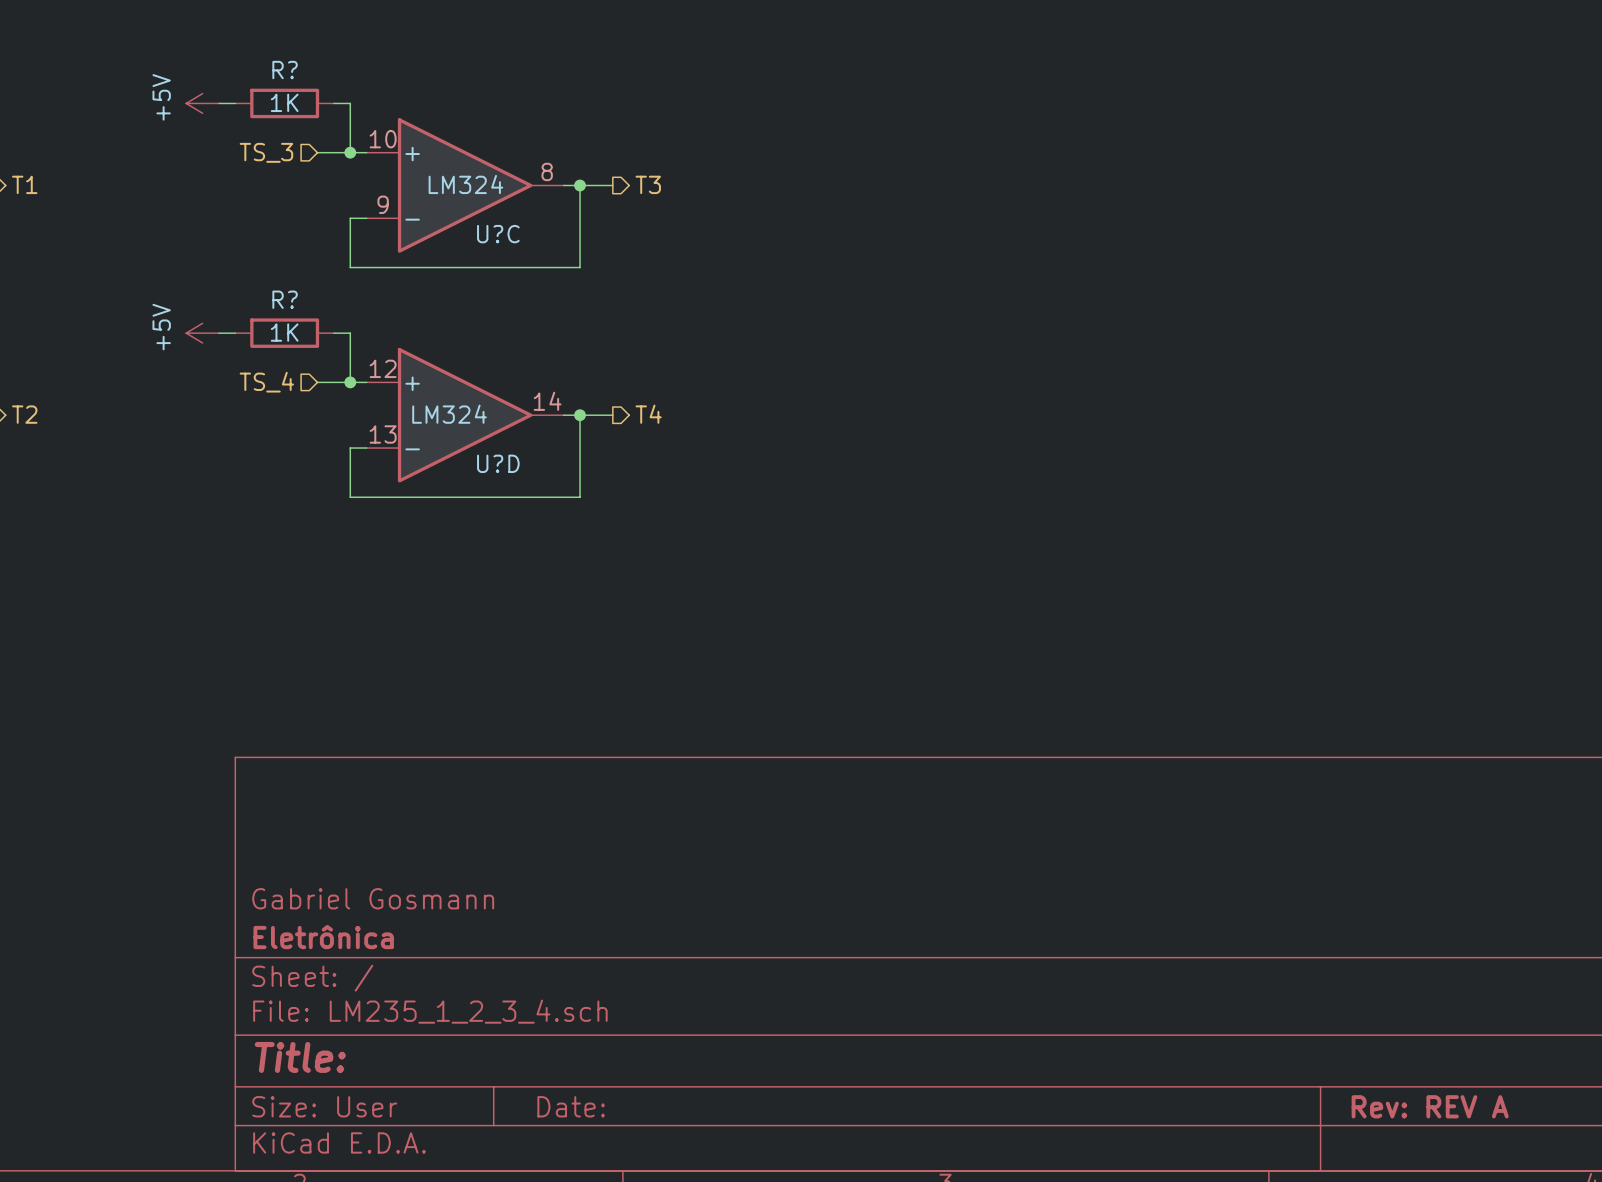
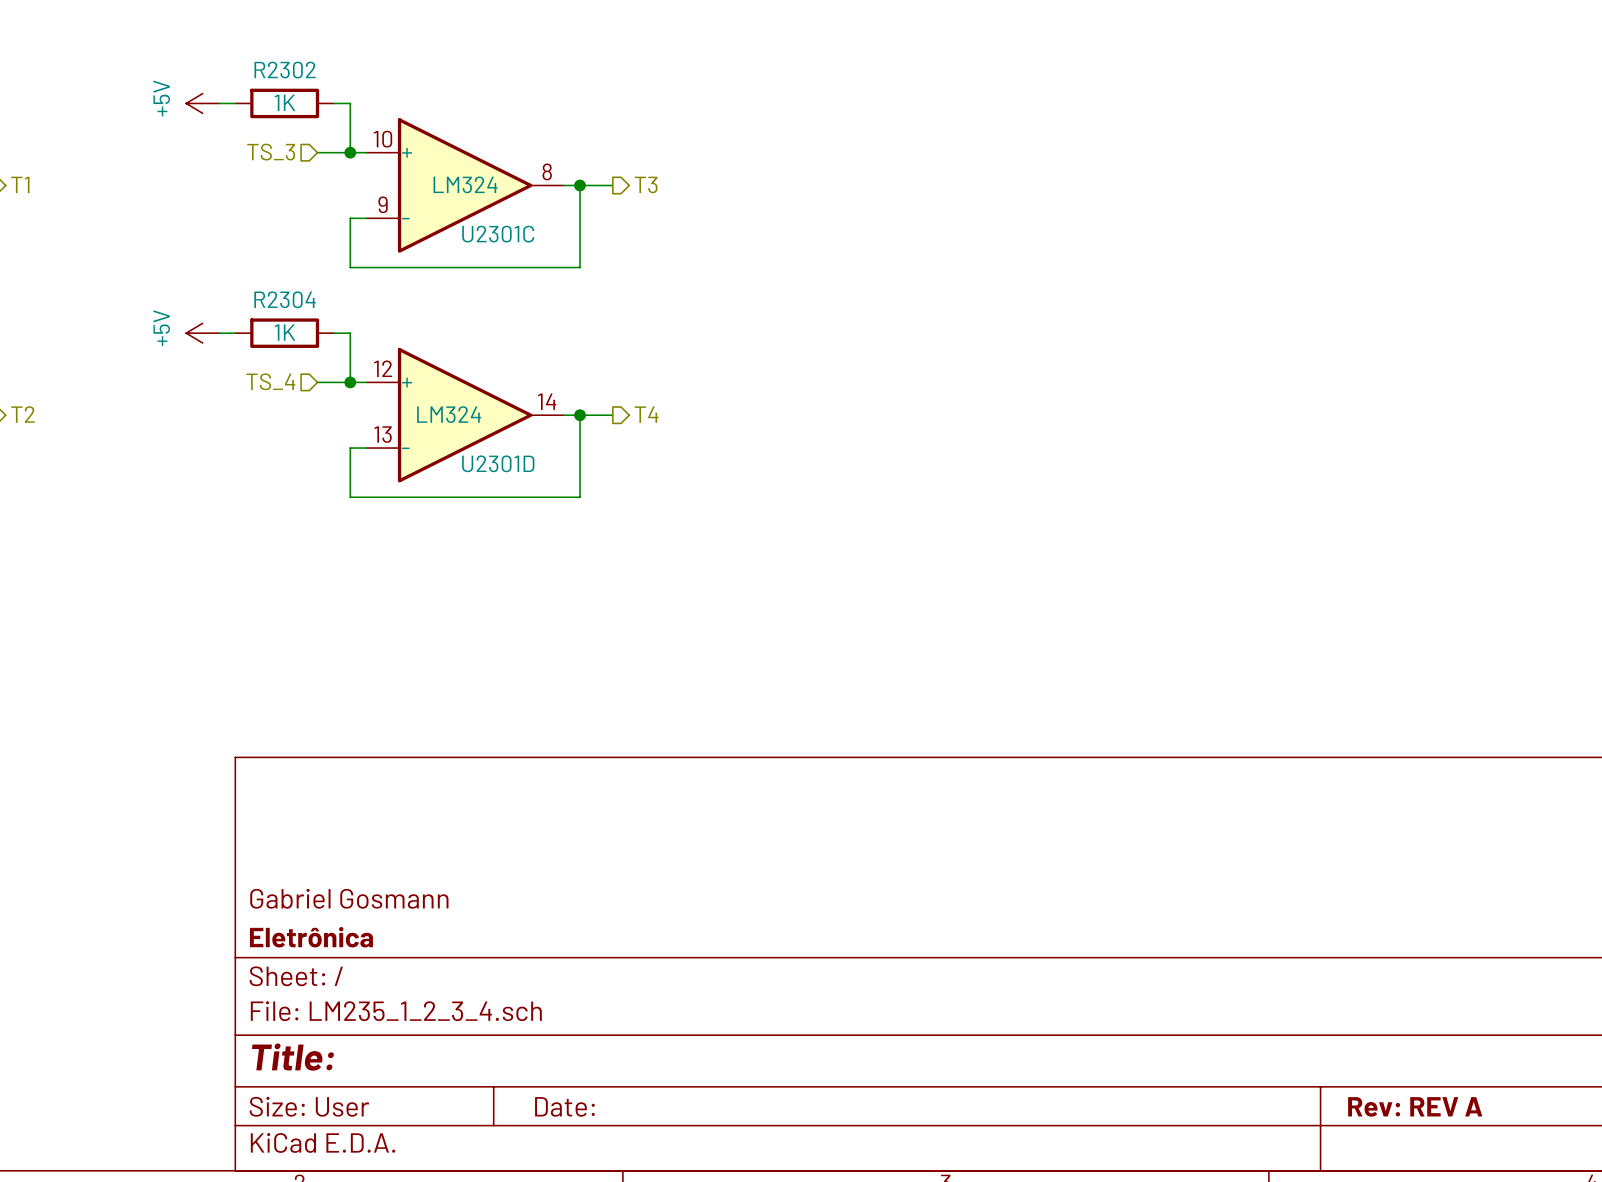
R? name: R? (285, 70) -> R2302 (285, 70)
U?C name: U?C (498, 234) -> U2301C (498, 234)
R? name: R? (285, 299) -> R2304 (285, 299)
U?D name: U?D (498, 463) -> U2301D (498, 463)

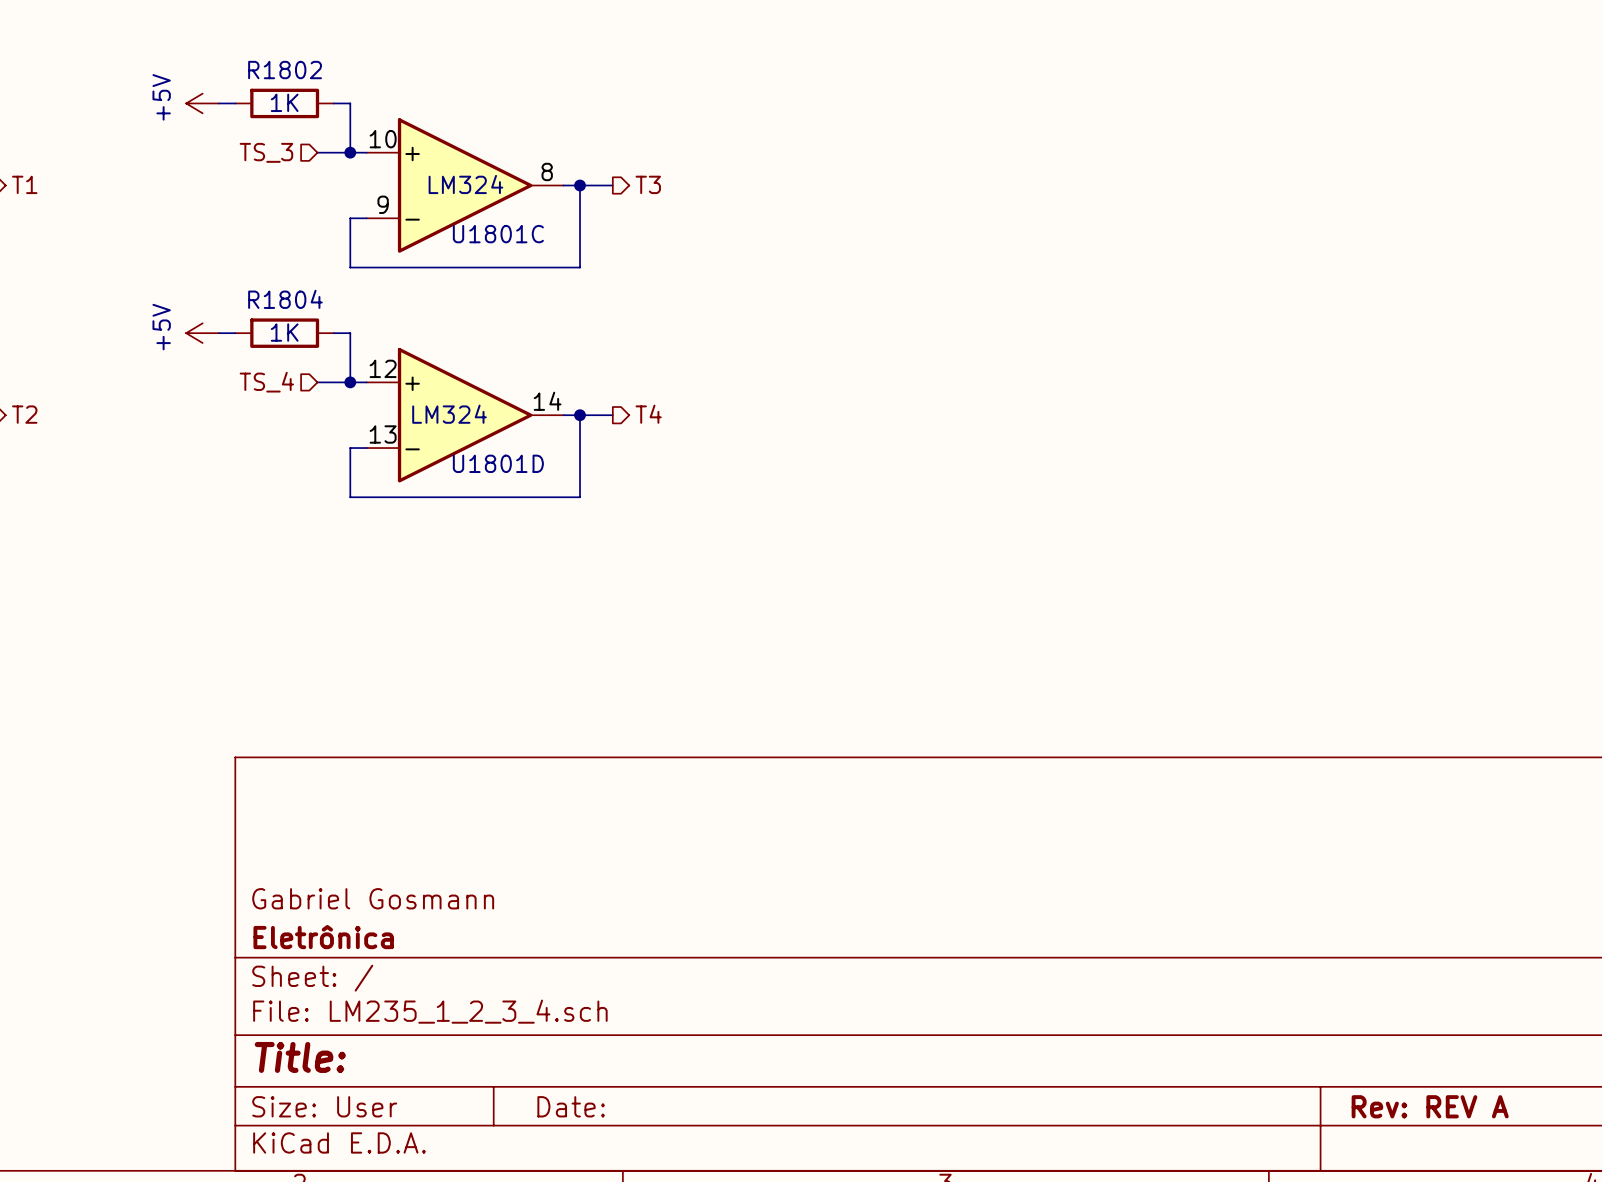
R2302 name: R2302 (285, 70) -> R1802 (285, 70)
U2301C name: U2301C (498, 234) -> U1801C (498, 234)
R2304 name: R2304 (285, 299) -> R1804 (285, 299)
U2301D name: U2301D (498, 463) -> U1801D (498, 463)

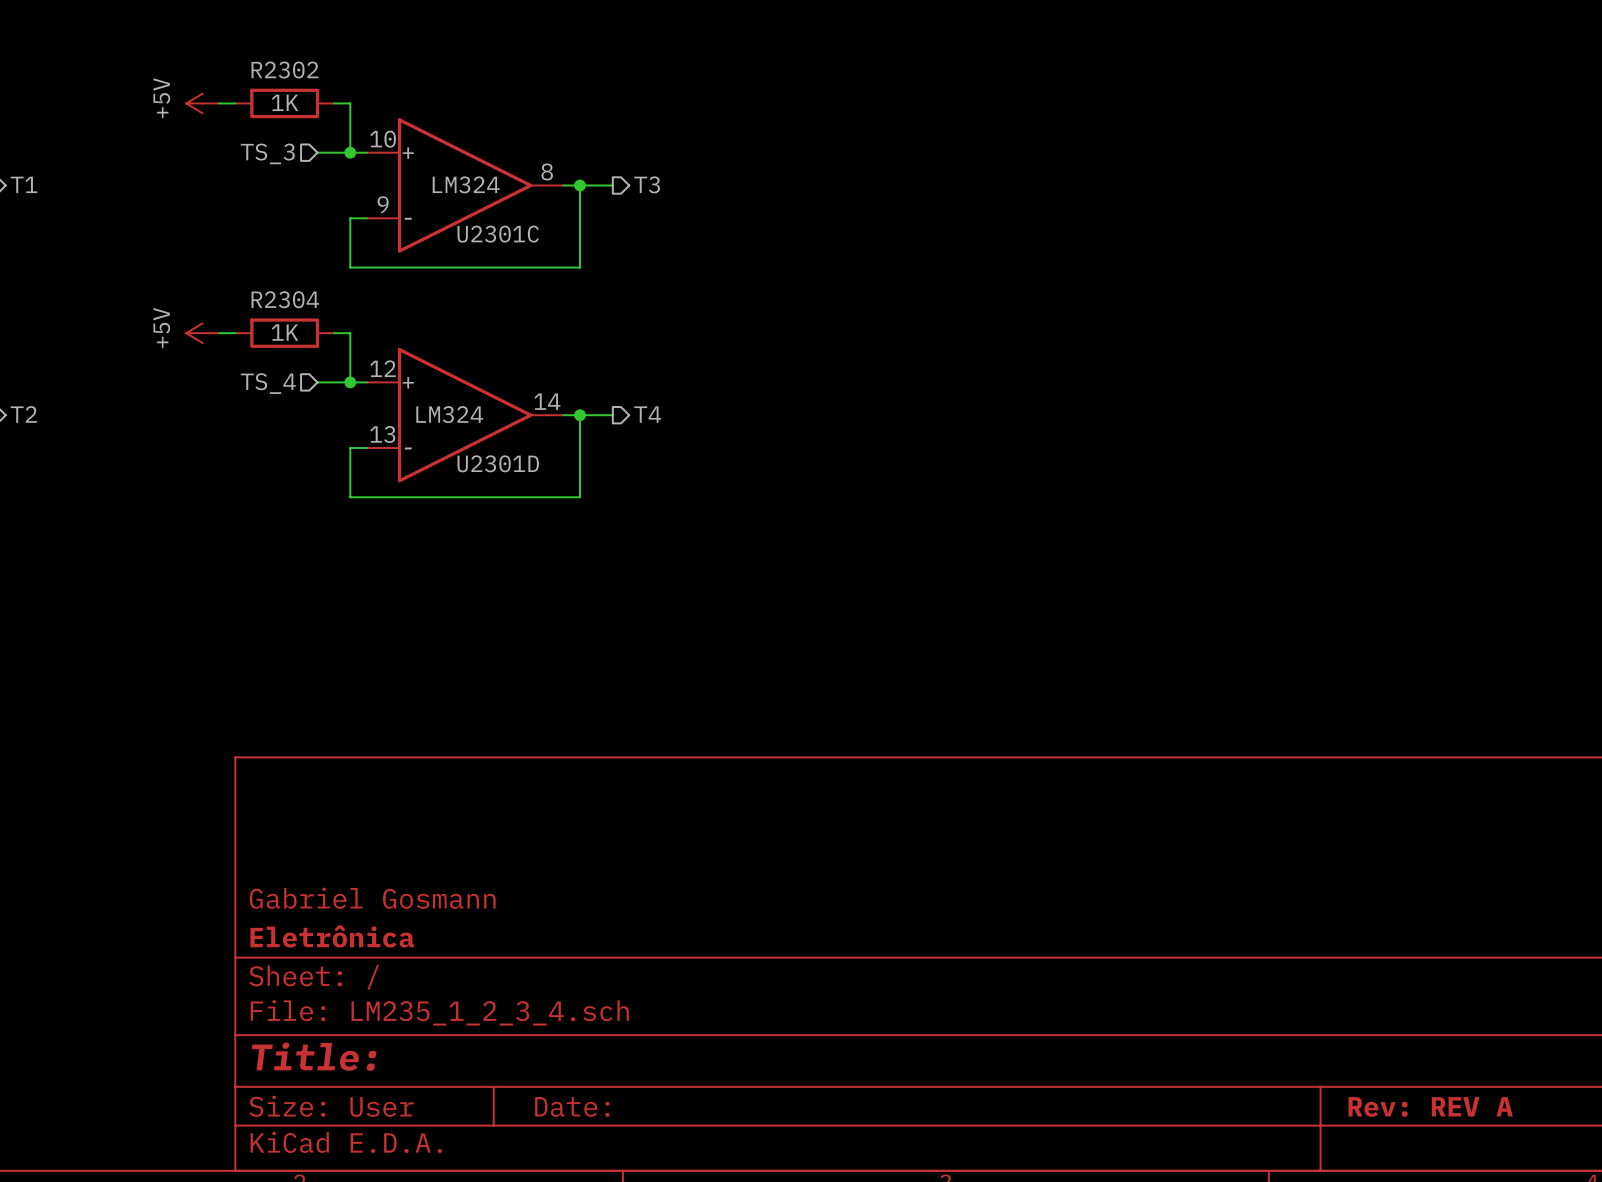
R1802 name: R1802 (285, 70) -> R2302 (284, 70)
U1801C name: U1801C (498, 234) -> U2301C (498, 234)
R1804 name: R1804 (285, 299) -> R2304 (285, 299)
U1801D name: U1801D (498, 463) -> U2301D (498, 463)

